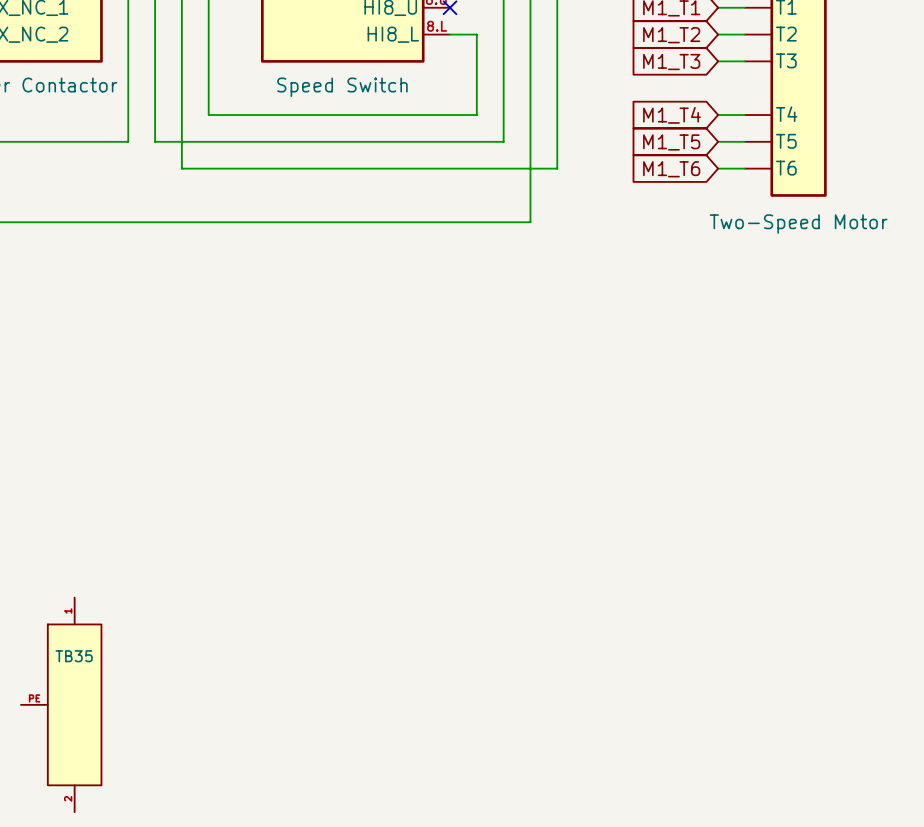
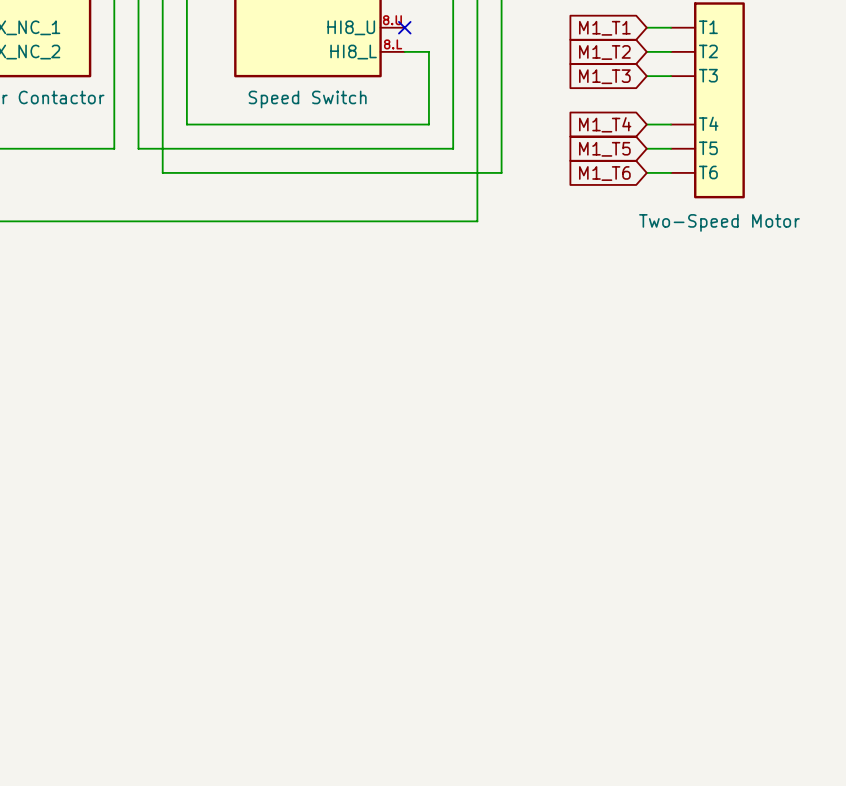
TB35: (61, 704) -> none

